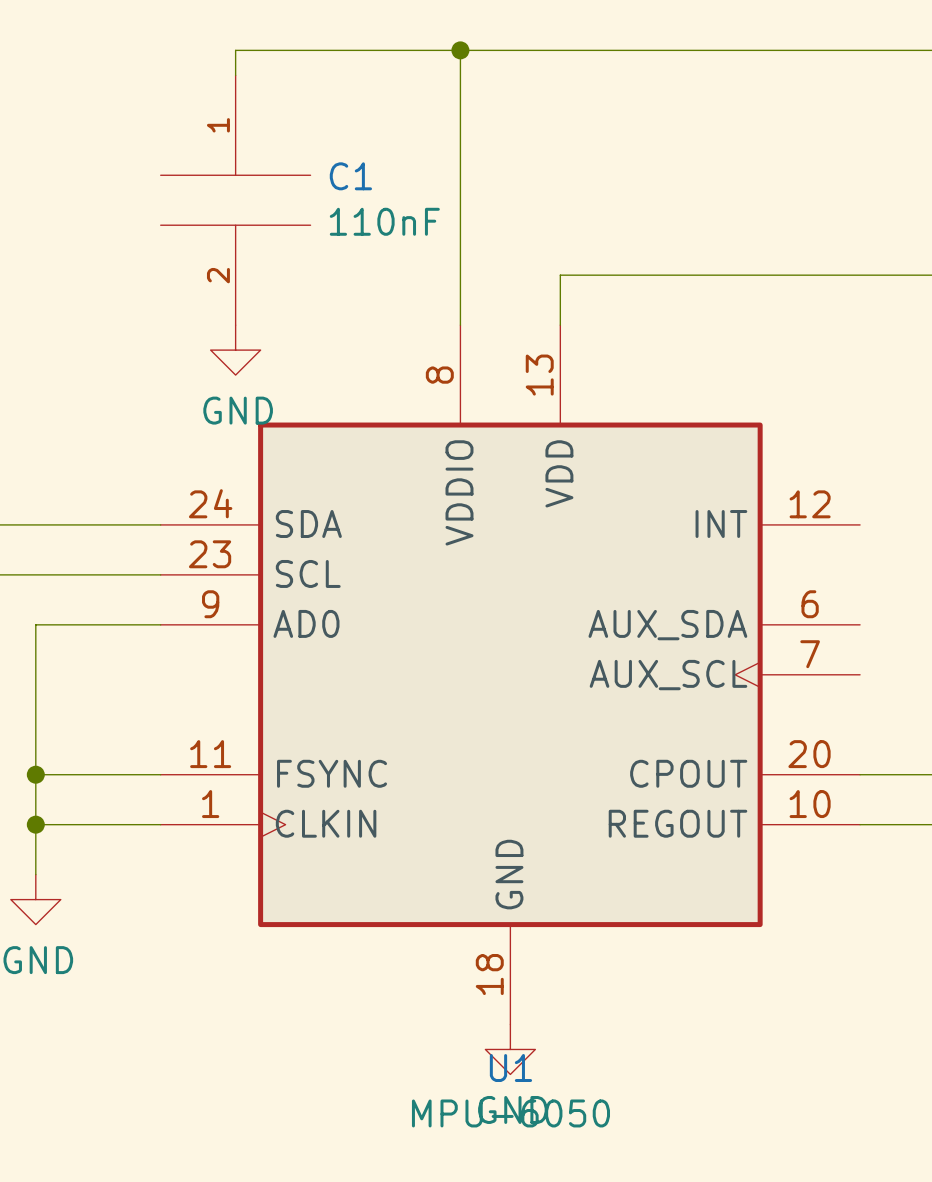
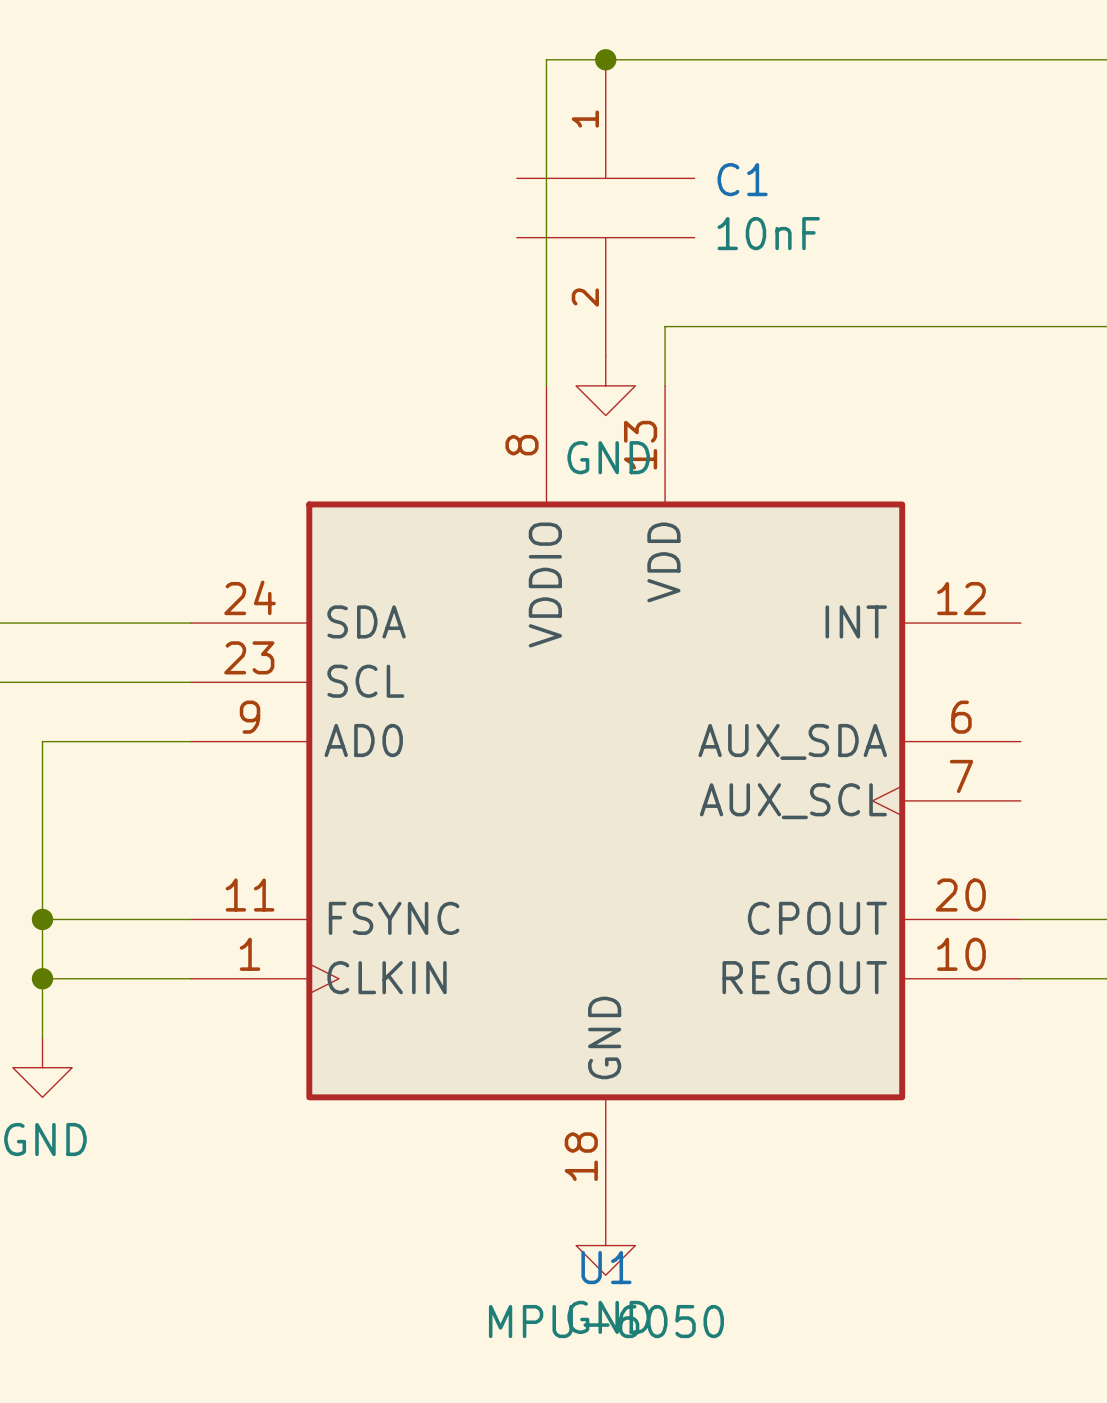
wire: (460, 50) (235, 50) (235, 75) -> none
junction position: (460, 50) -> (605, 59)
C1 position: (235, 200) -> (605, 208)
C1 value: 110nF (384, 221) -> 10nF (768, 233)
power symbol position: GND (235, 350) -> GND (605, 385)

